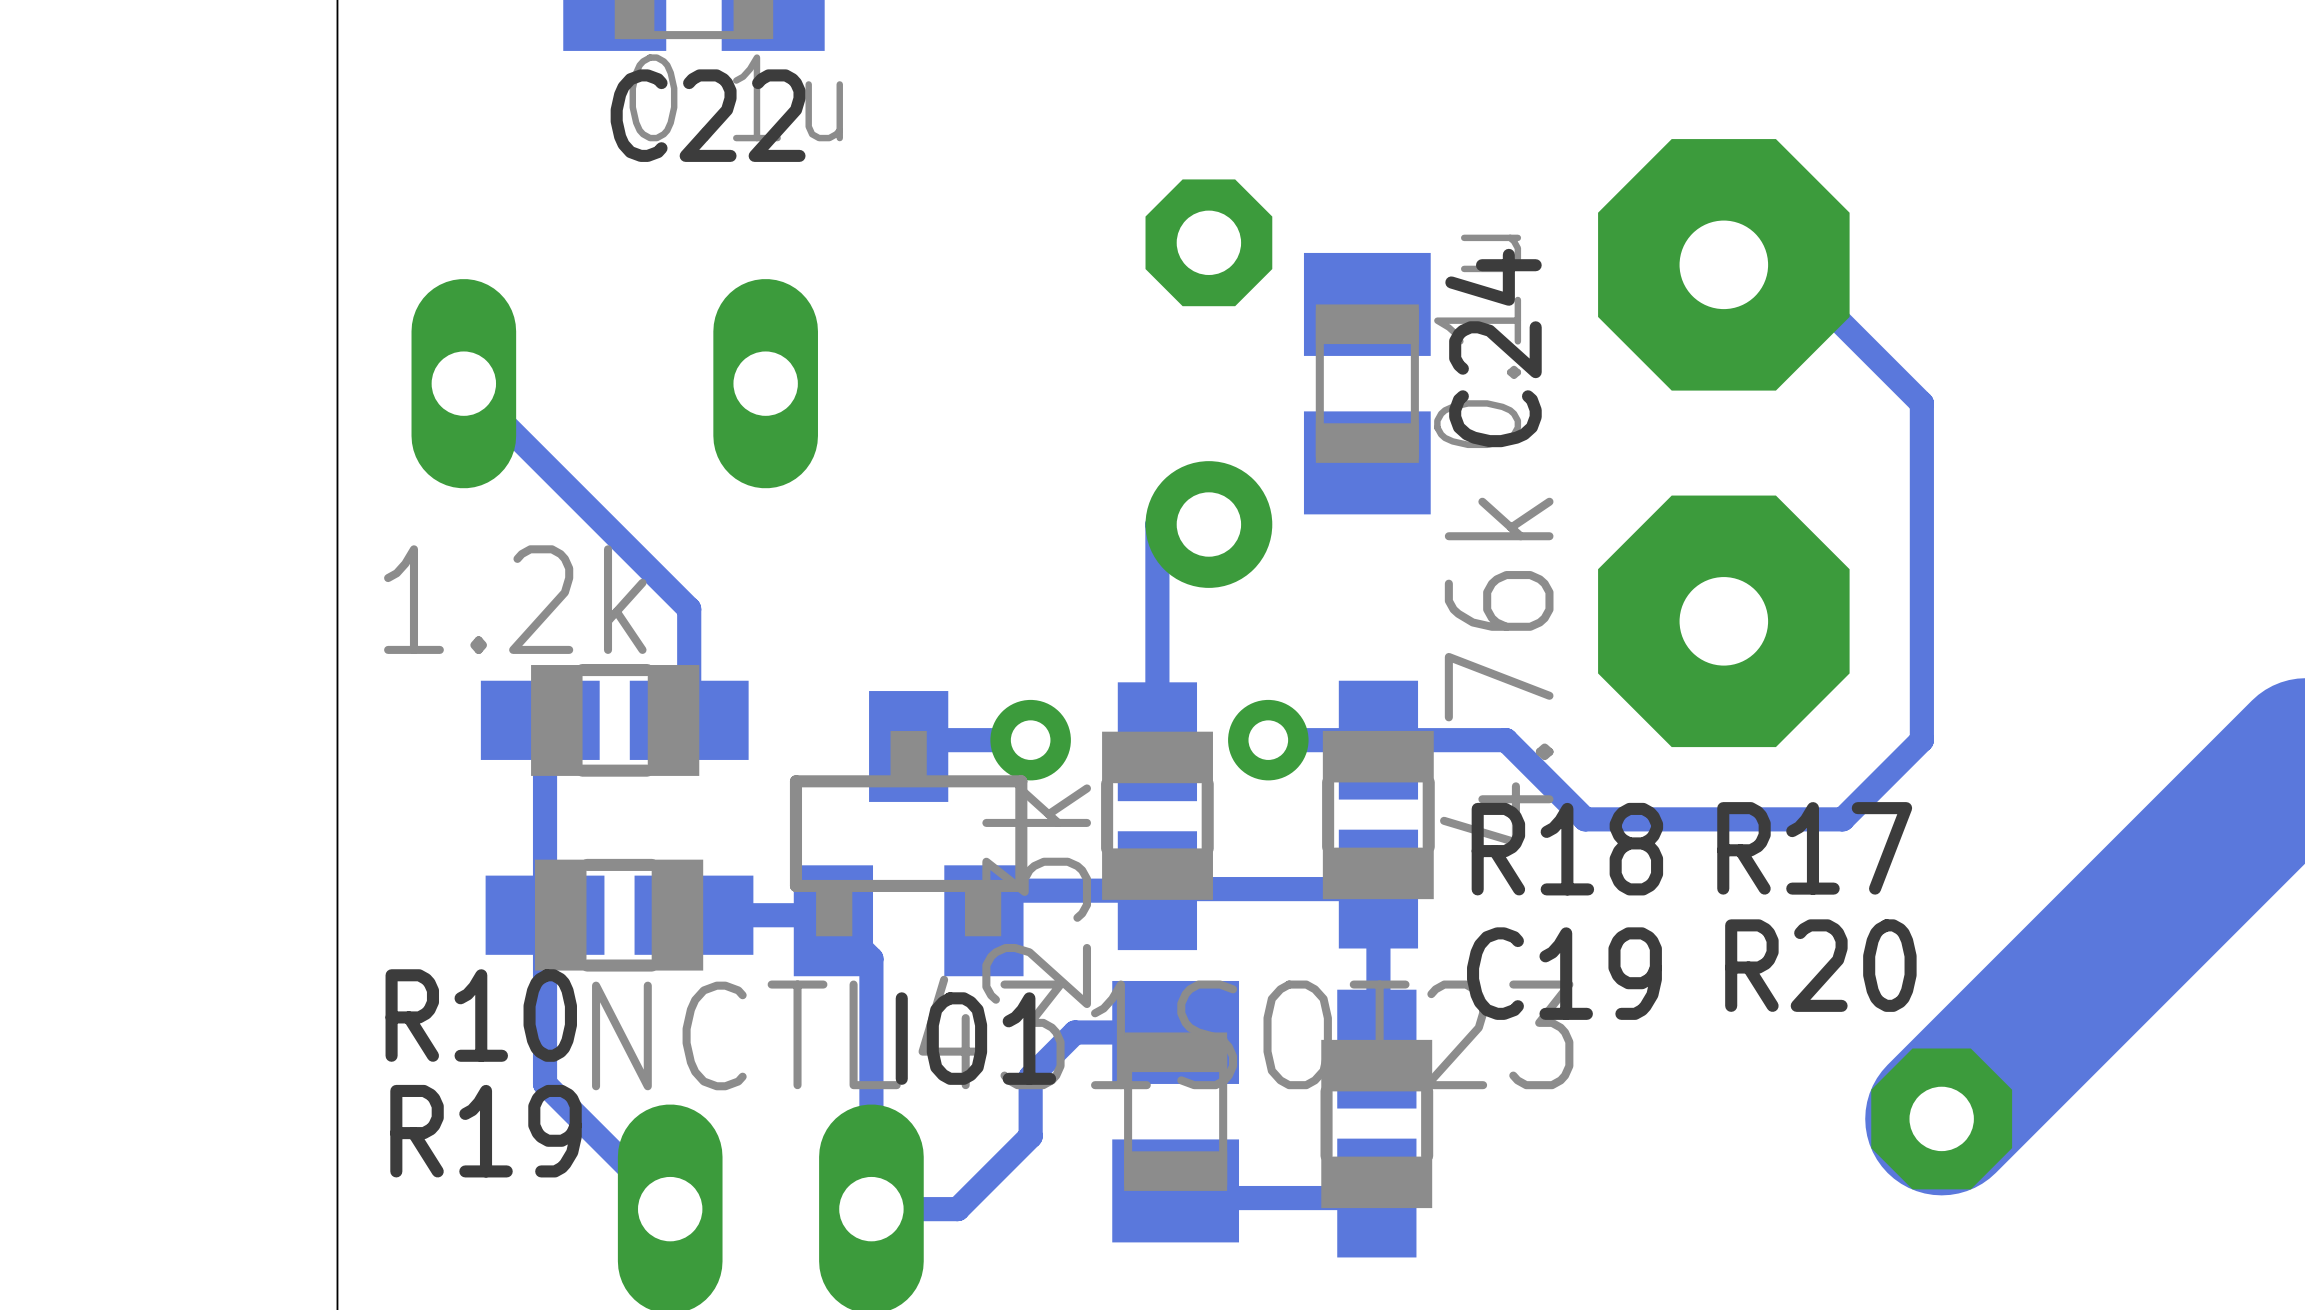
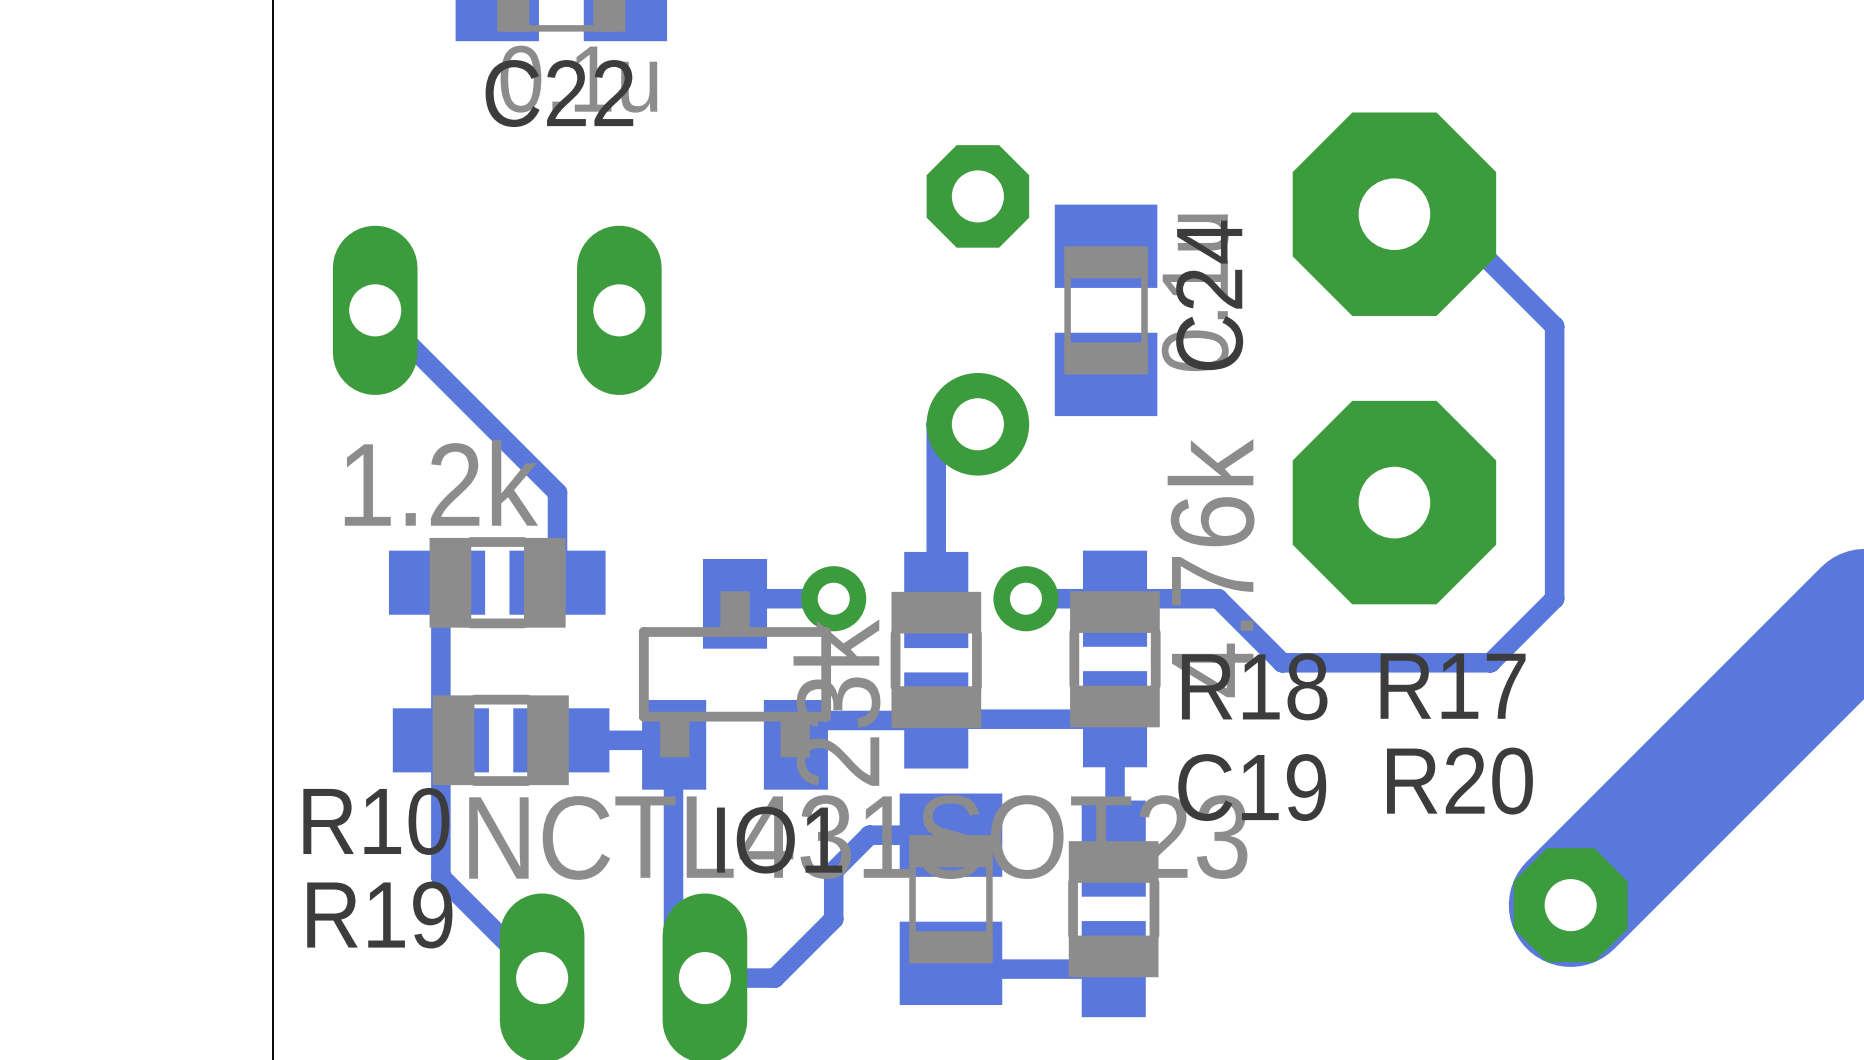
track: (833, 920) (871, 958) (871, 1209) -> (673, 744) (673, 946) (704, 978)

